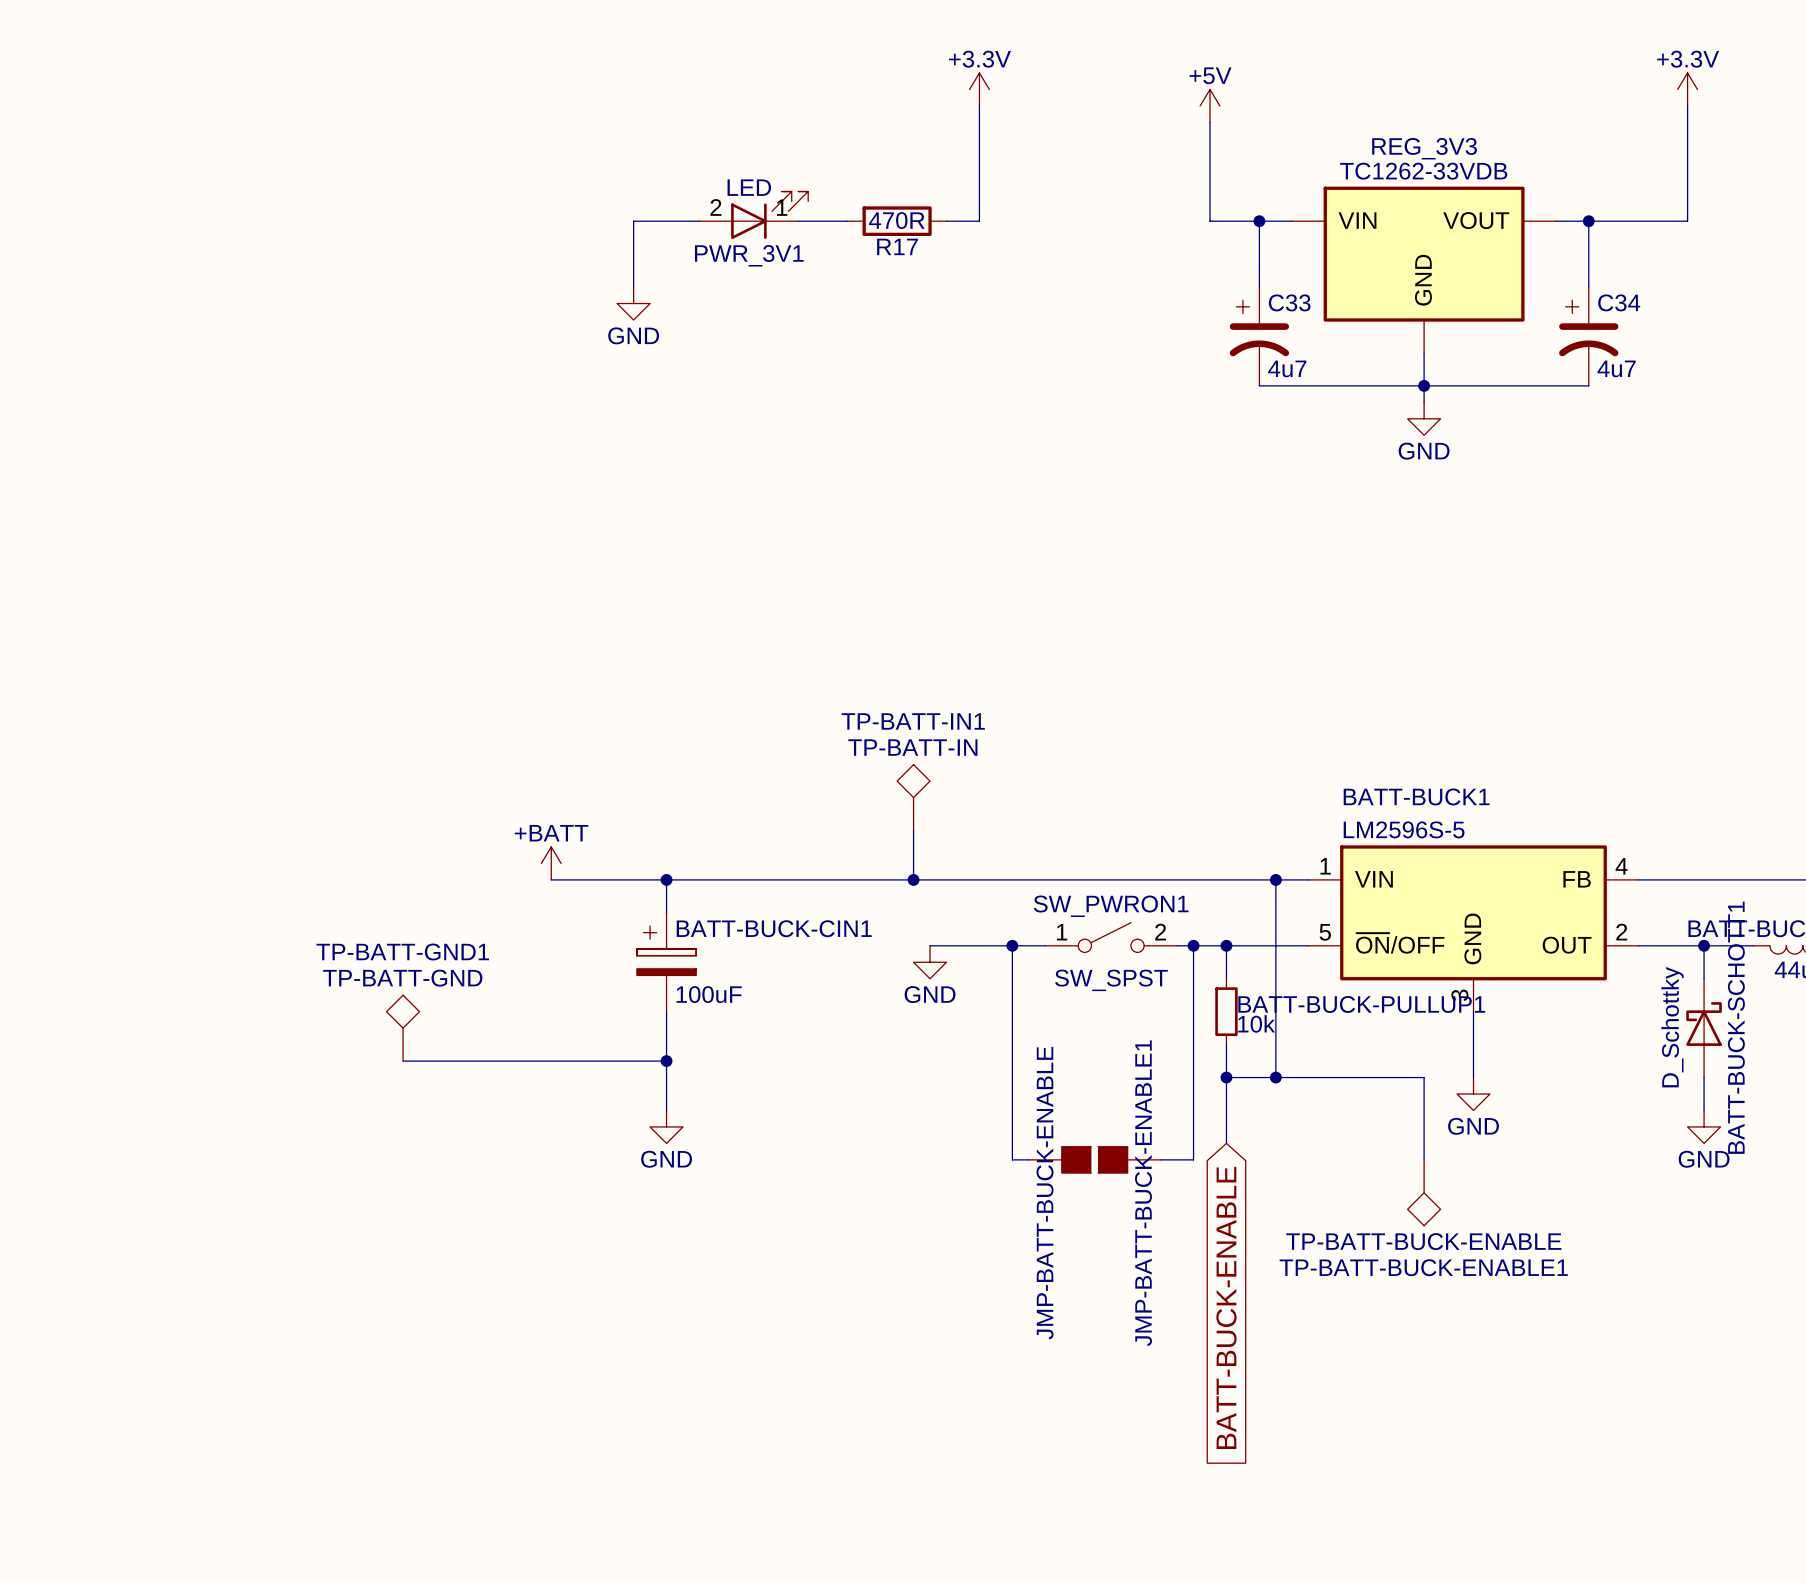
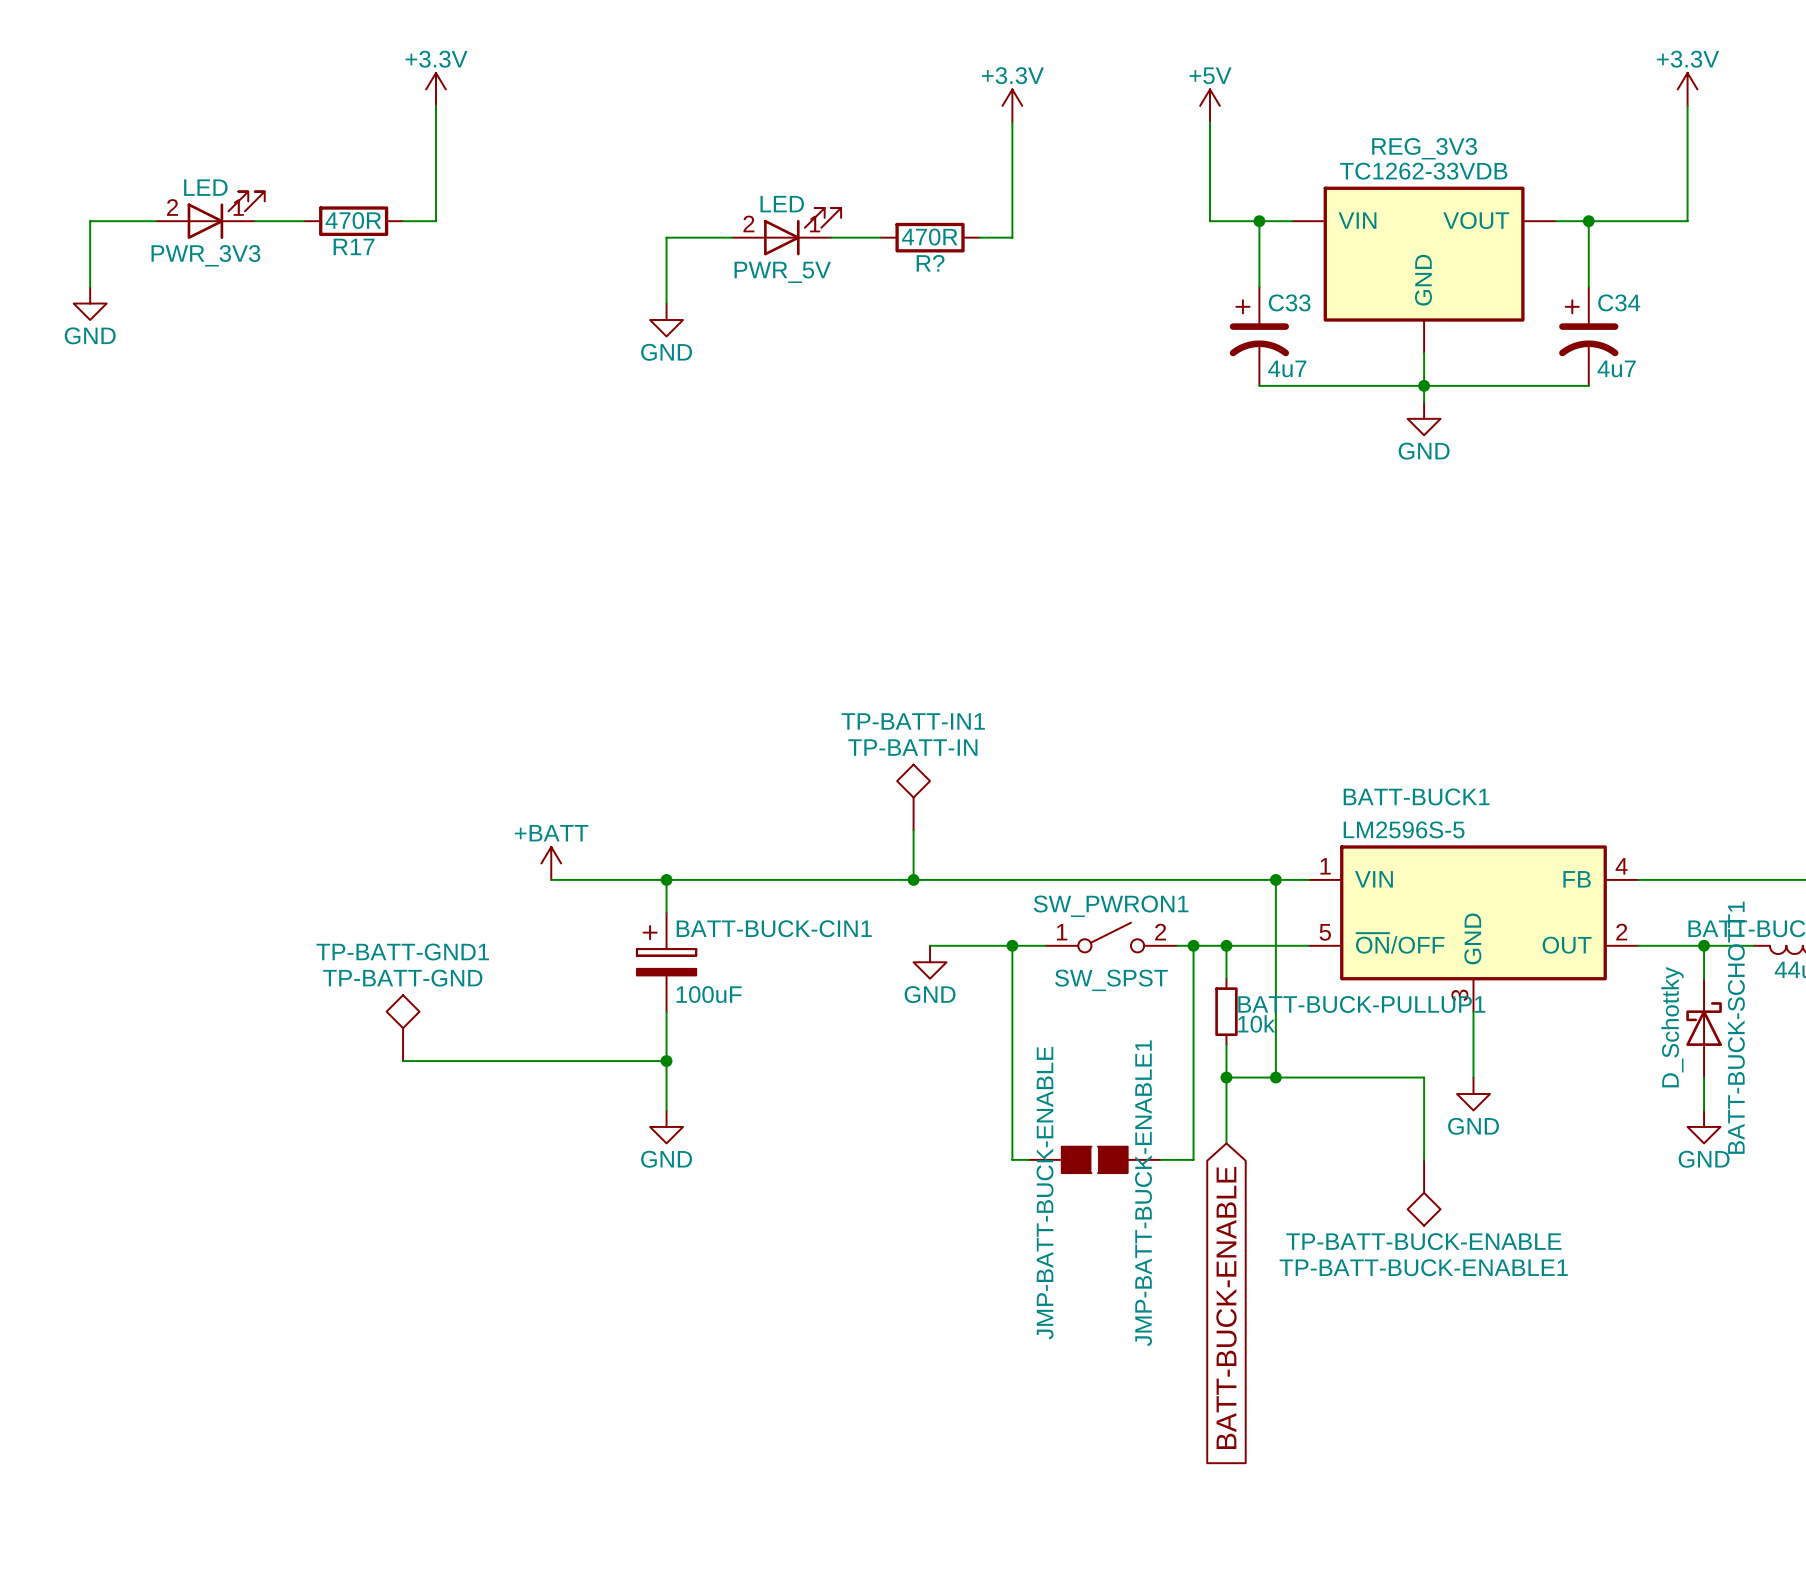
power symbol: none -> +3.3V (435, 89)
power symbol position: +3.3V (979, 89) -> +3.3V (1012, 105)
wire: none -> (435, 105) (435, 221) (403, 221)
wire: (979, 105) (979, 221) (946, 221) -> (1012, 122) (1012, 237) (979, 237)
PWR_3V3: none -> LED (210, 215)
PWR_3V1: LED (753, 215) -> none
wire: none -> (156, 221) (90, 221) (90, 287)
wire: none -> (254, 221) (304, 221)
wire: (699, 221) (633, 221) (633, 287) -> (732, 237) (666, 237) (666, 303)
wire: (798, 221) (847, 221) -> (831, 237) (880, 237)
R17 position: (897, 221) -> (353, 221)
PWR_5V: none -> LED (786, 231)
R?: none -> 470R (930, 237)
power symbol: none -> GND (90, 303)
power symbol position: GND (633, 303) -> GND (666, 320)

